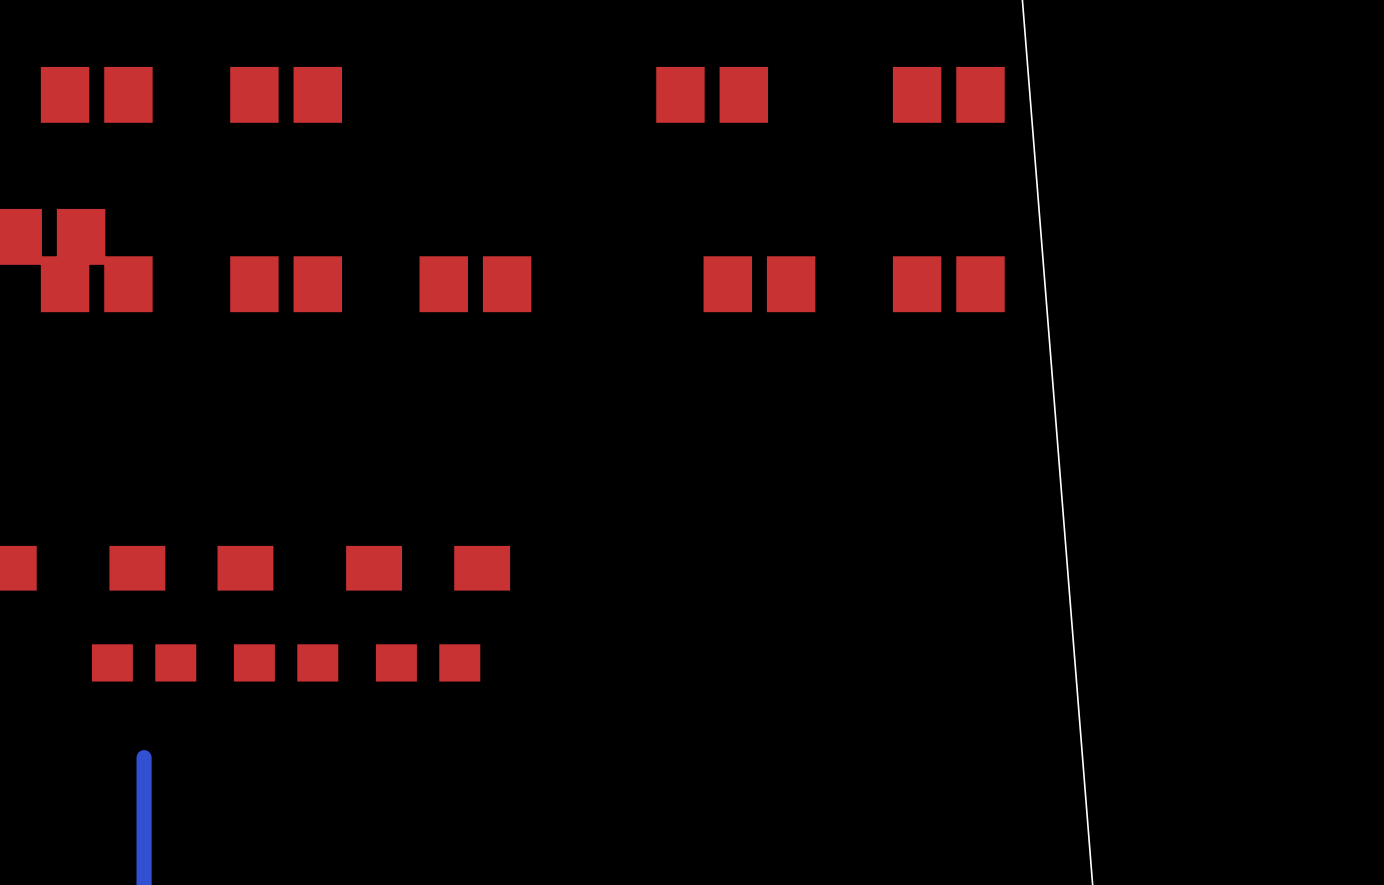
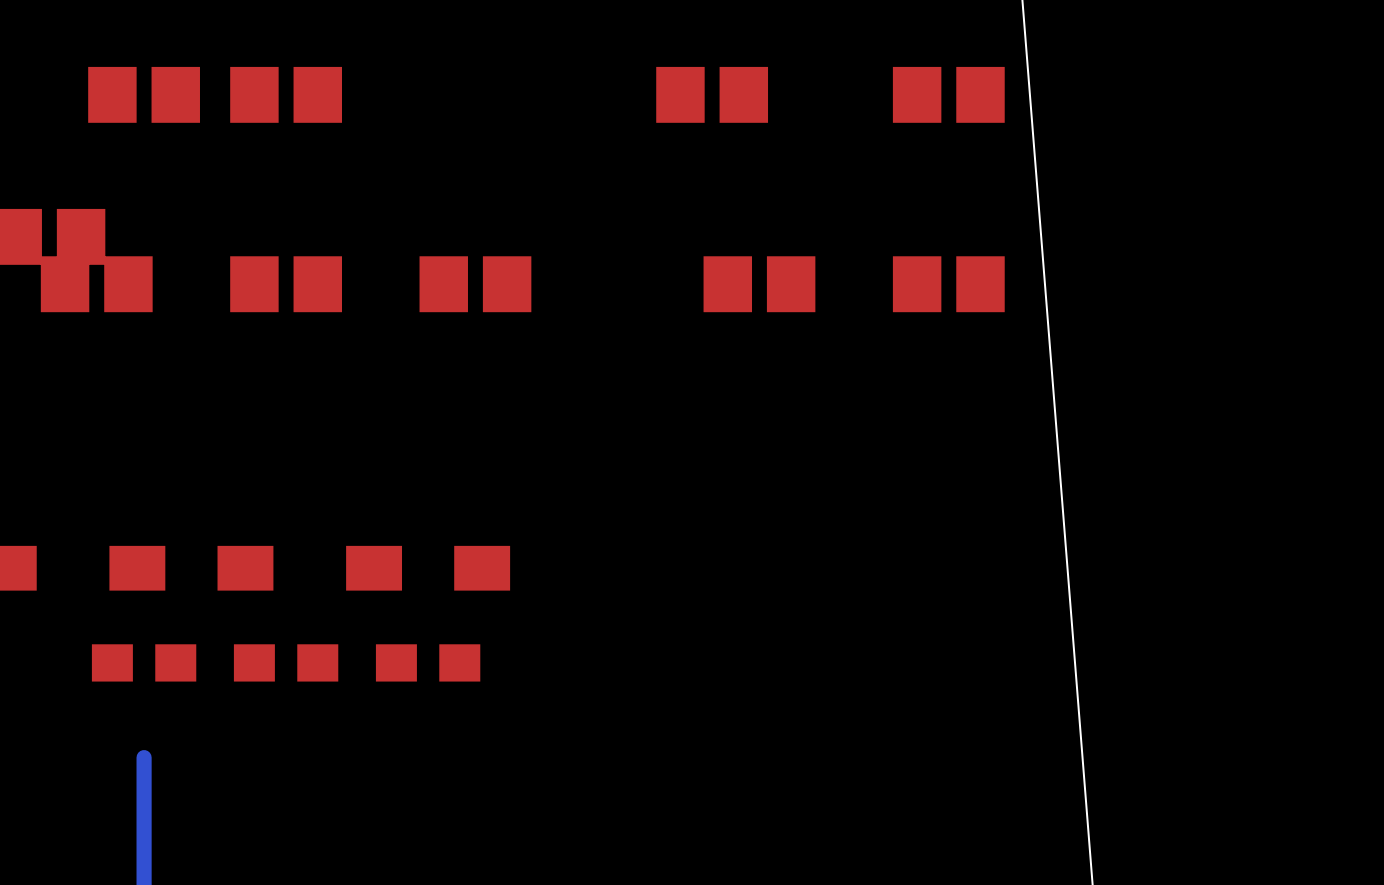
part position: (96, 94) -> (144, 94)

